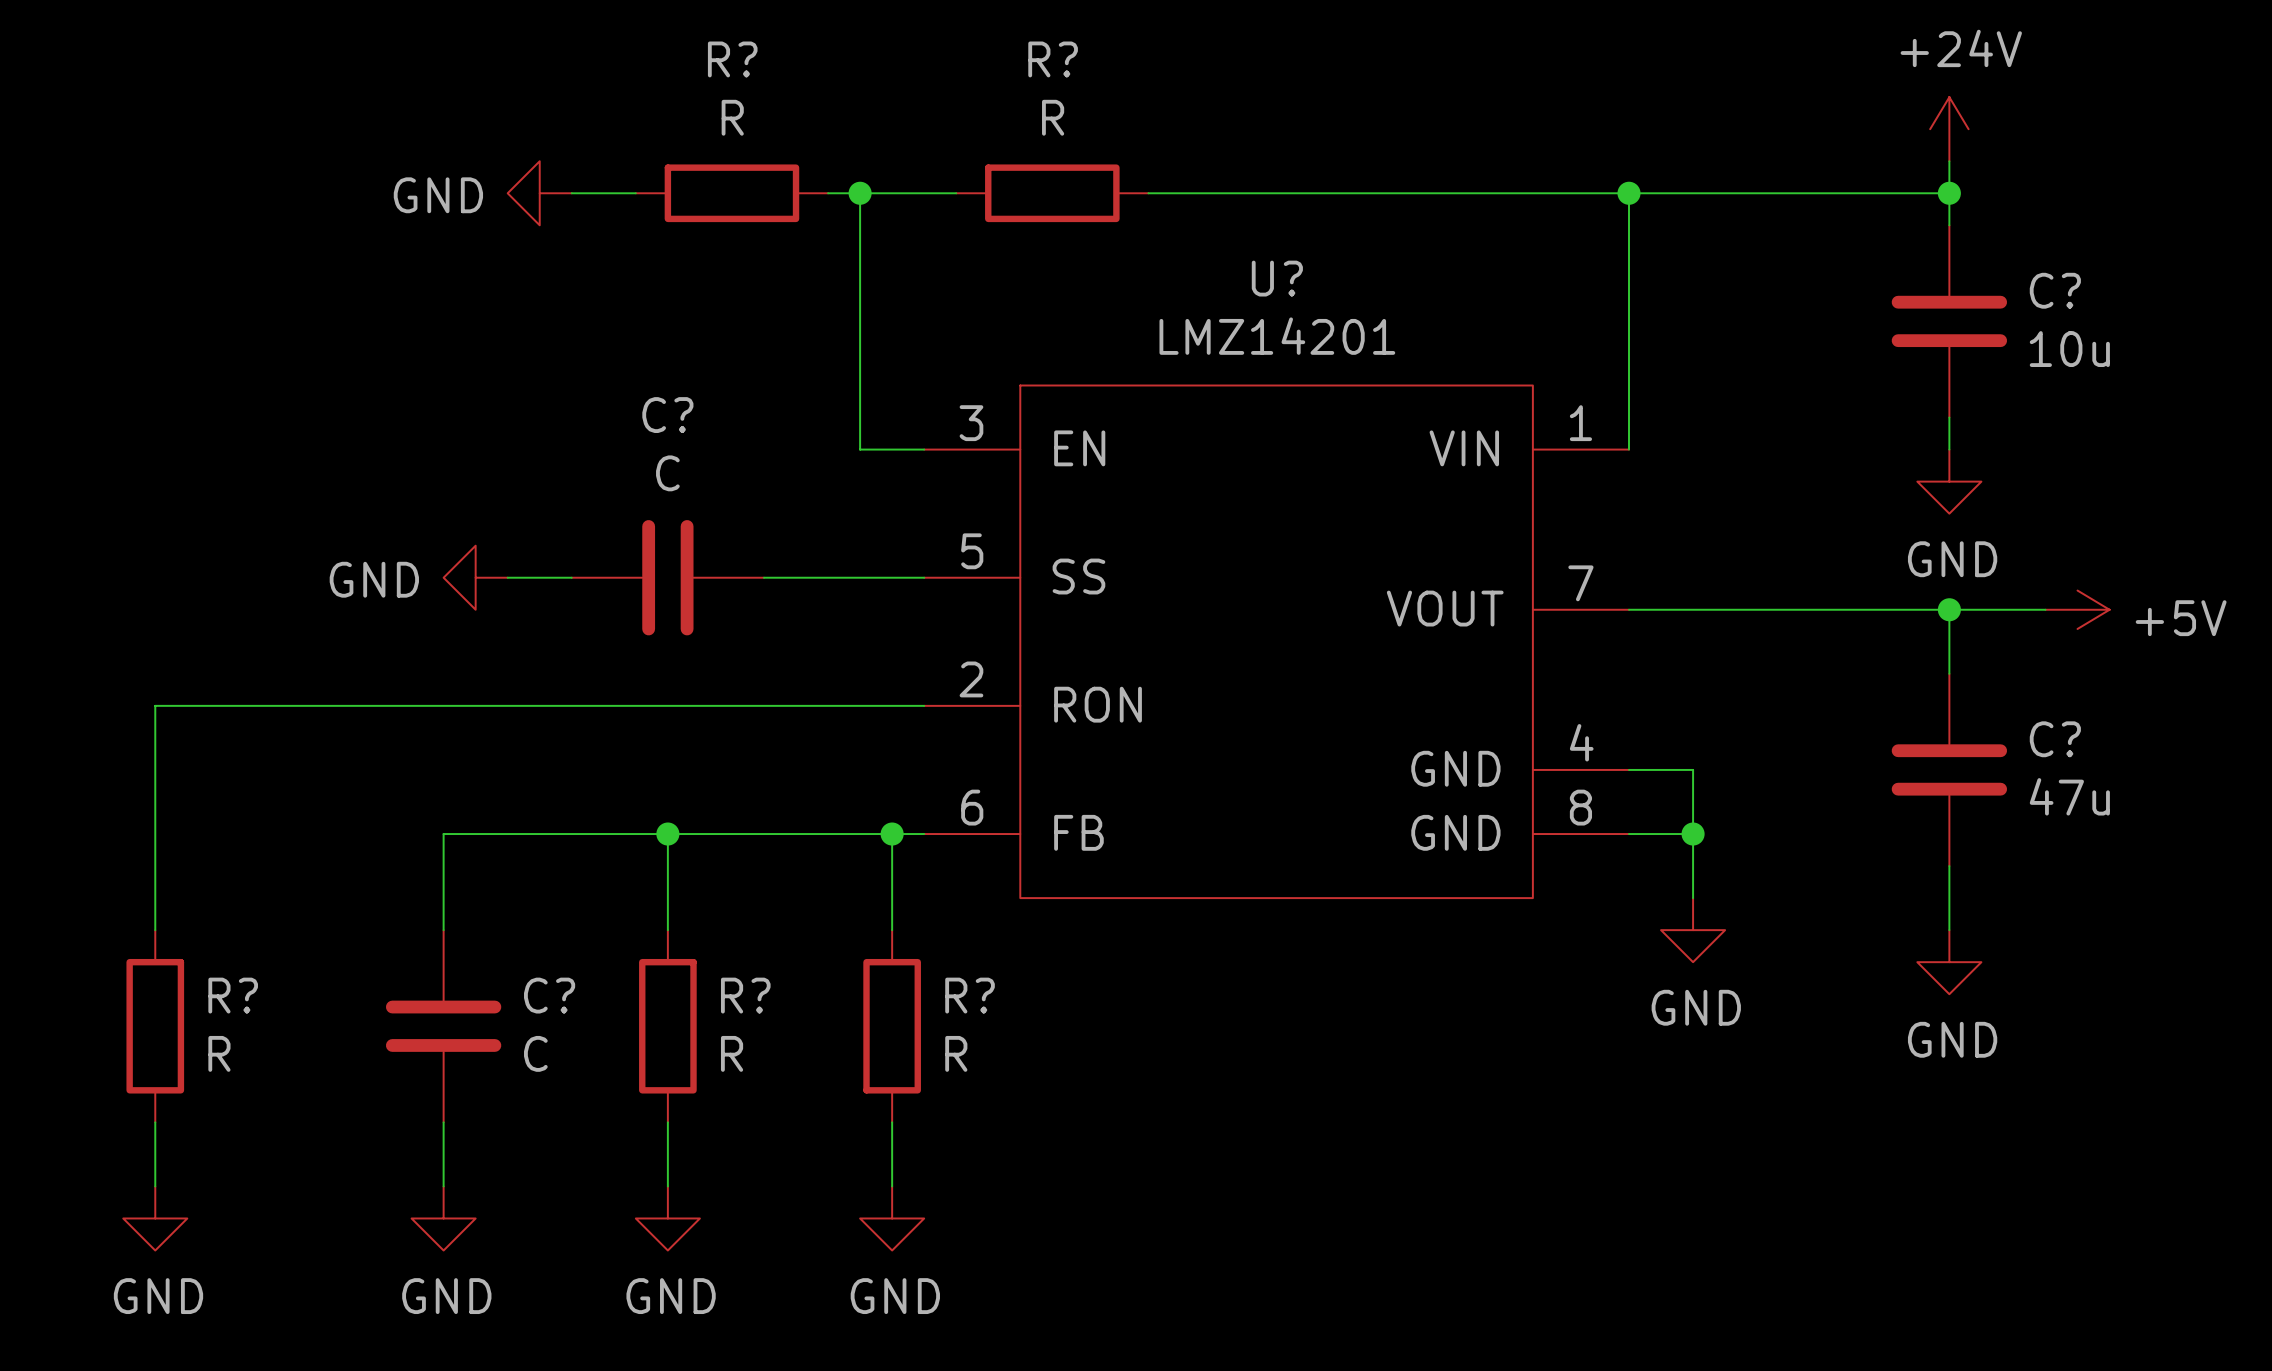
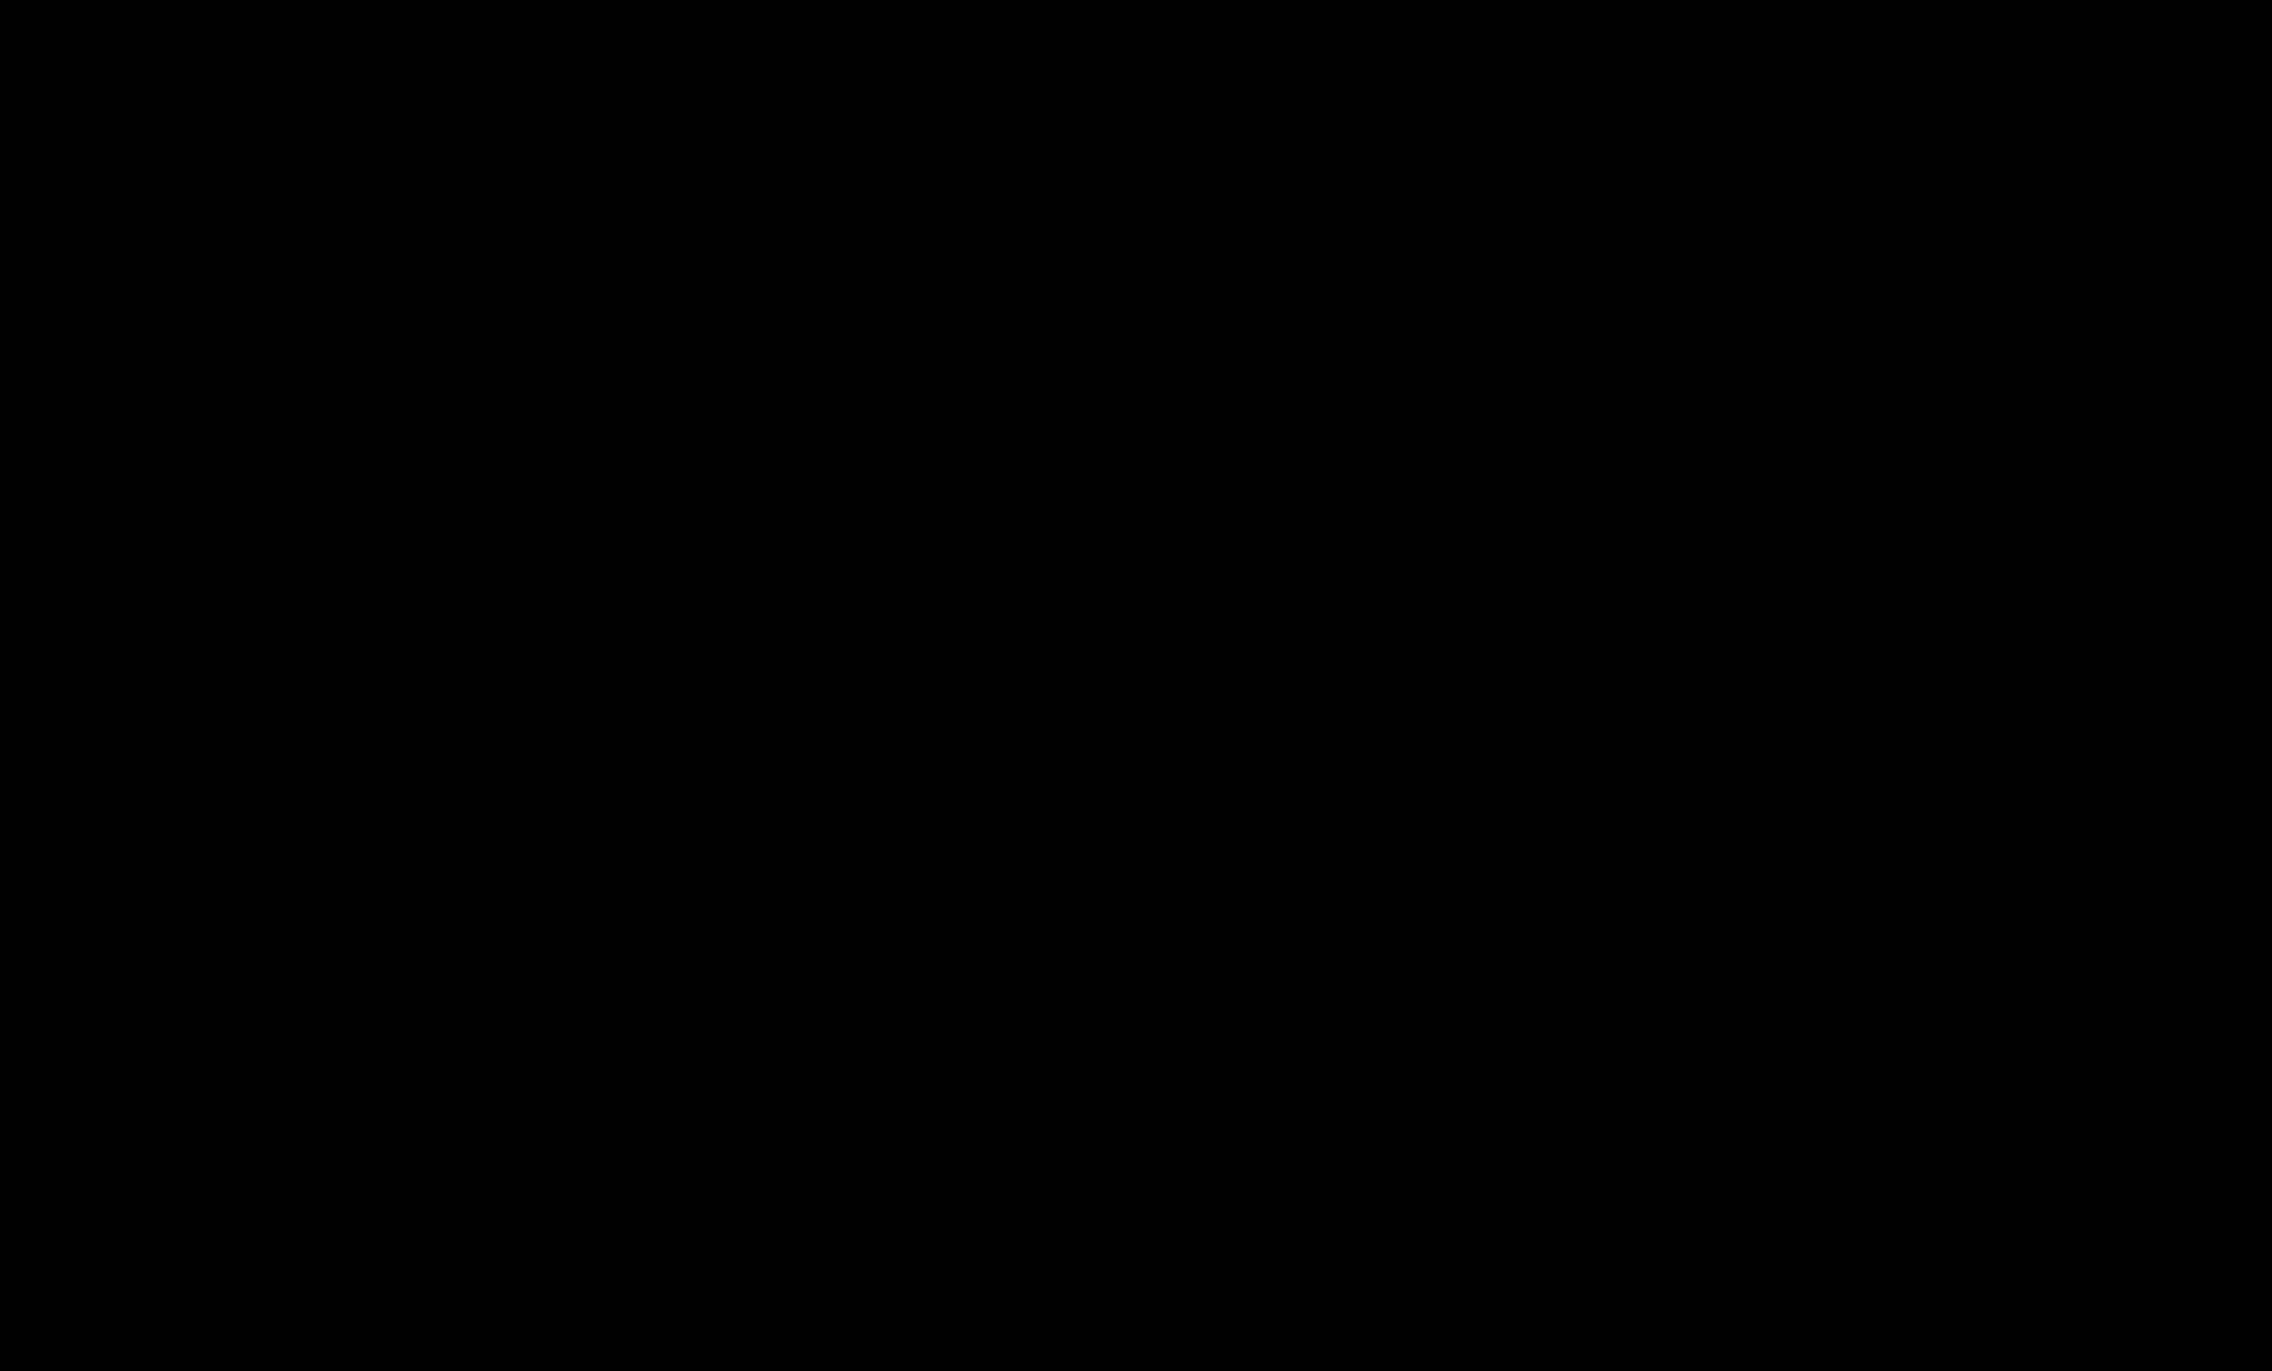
power symbol: +24V (1949, 129) -> none
wire: (1949, 161) (1949, 225) -> none
power symbol: GND (539, 193) -> none
wire: (571, 193) (635, 193) -> none
R?: R (731, 193) -> none
wire: (828, 193) (956, 193) -> none
wire: (860, 193) (860, 449) (924, 449) -> none
junction: (860, 193) -> none
R?: R (1052, 193) -> none
wire: (1148, 193) (1949, 193) -> none
wire: (1629, 193) (1629, 449) -> none
junction: (1629, 193) -> none
junction: (1949, 193) -> none
C?: 10u (1949, 321) -> none
wire: (1949, 417) (1949, 449) -> none
power symbol: GND (1949, 481) -> none
power symbol: GND (475, 577) -> none
wire: (507, 577) (571, 577) -> none
C?: C (667, 577) -> none
wire: (763, 577) (924, 577) -> none
wire: (1629, 609) (2045, 609) -> none
wire: (1949, 609) (1949, 673) -> none
junction: (1949, 609) -> none
power symbol: +5V (2077, 609) -> none
U?: LMZ14201 (1276, 641) -> none
wire: (924, 705) (155, 705) (155, 930) -> none
wire: (1629, 769) (1693, 769) (1693, 898) -> none
C?: 47u (1949, 769) -> none
wire: (667, 834) (667, 930) -> none
junction: (667, 834) -> none
wire: (892, 834) (892, 930) -> none
junction: (892, 834) -> none
wire: (924, 834) (443, 834) (443, 930) -> none
wire: (1629, 834) (1693, 834) -> none
junction: (1693, 834) -> none
wire: (1949, 866) (1949, 930) -> none
power symbol: GND (1693, 930) -> none
power symbol: GND (1949, 962) -> none
R?: R (155, 1026) -> none
C?: C (443, 1026) -> none
R?: R (667, 1026) -> none
R?: R (892, 1026) -> none
wire: (155, 1122) (155, 1186) -> none
wire: (443, 1122) (443, 1186) -> none
wire: (667, 1122) (667, 1186) -> none
wire: (892, 1122) (892, 1186) -> none
power symbol: GND (155, 1218) -> none
power symbol: GND (443, 1218) -> none
power symbol: GND (667, 1218) -> none
power symbol: GND (892, 1218) -> none

